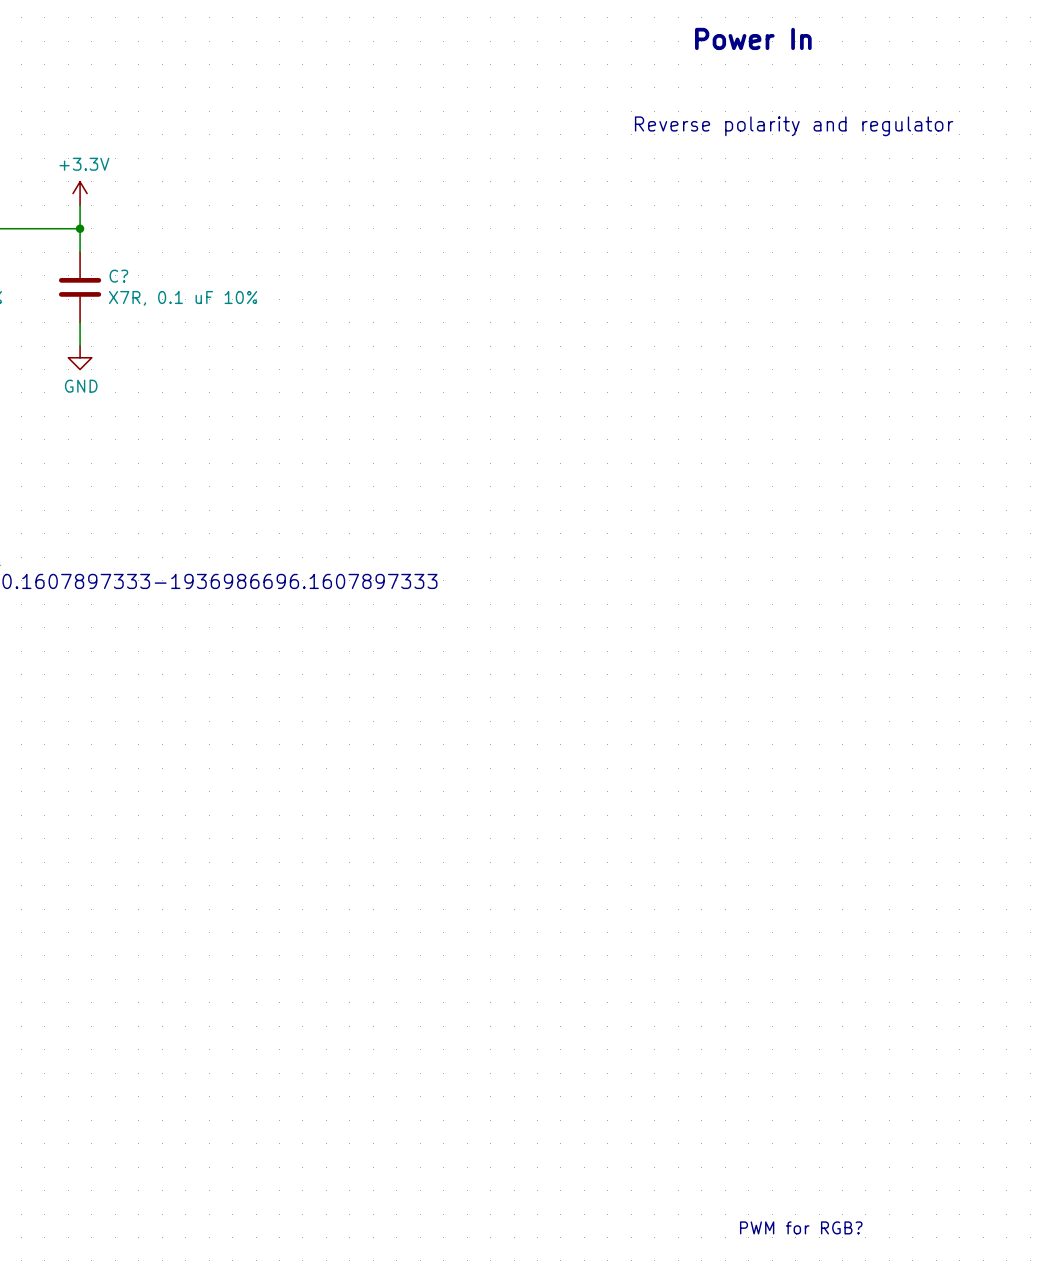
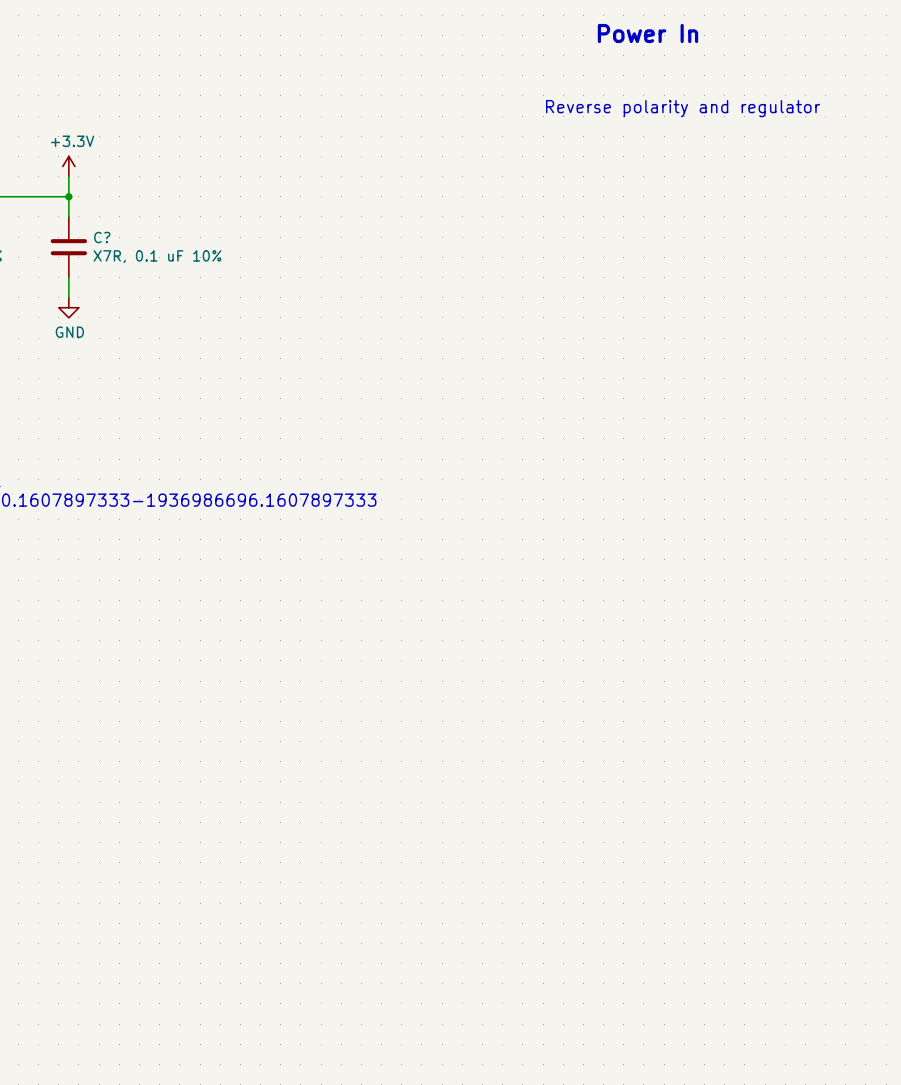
text: PWM for RGB? (801, 1227) -> none

